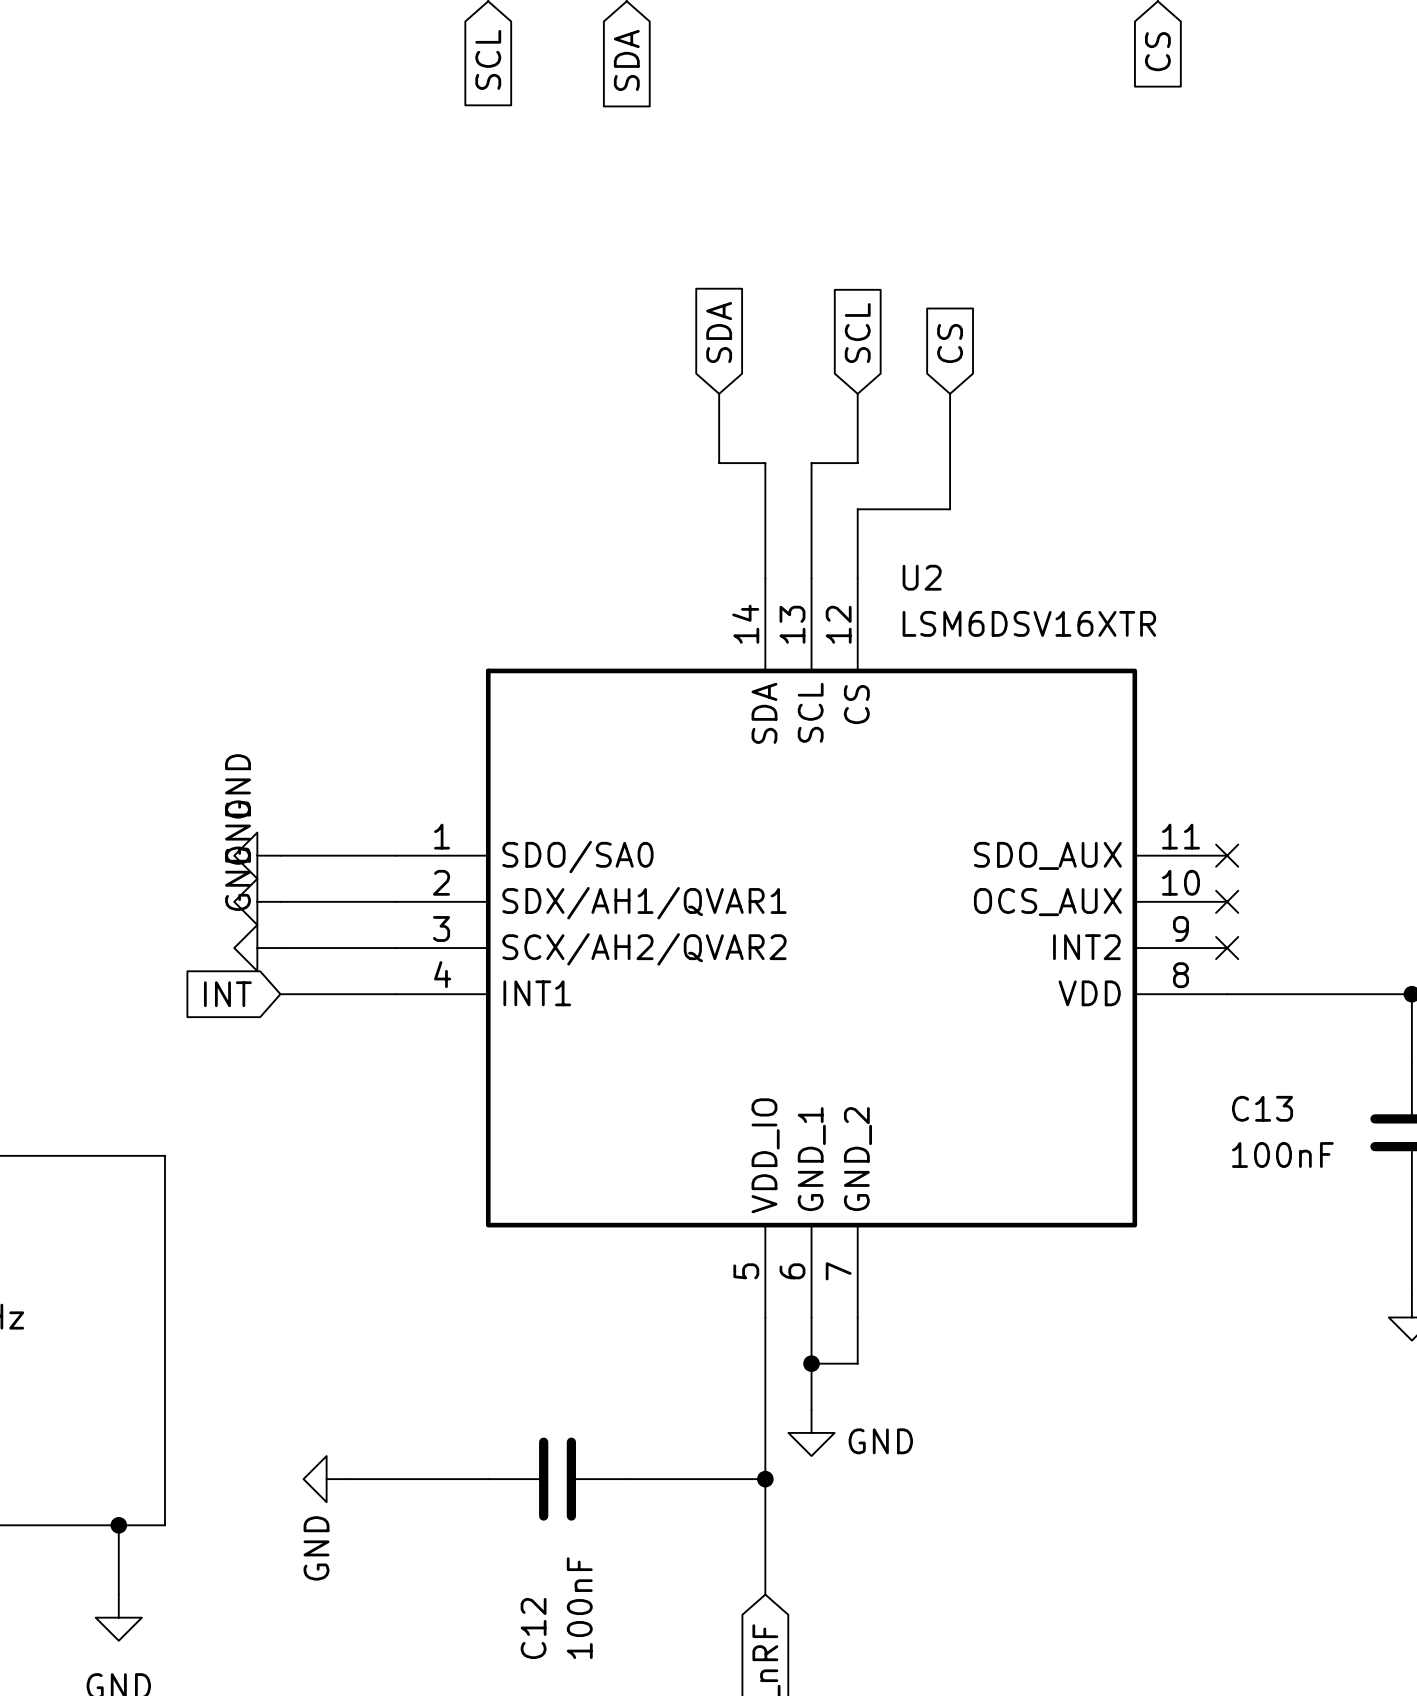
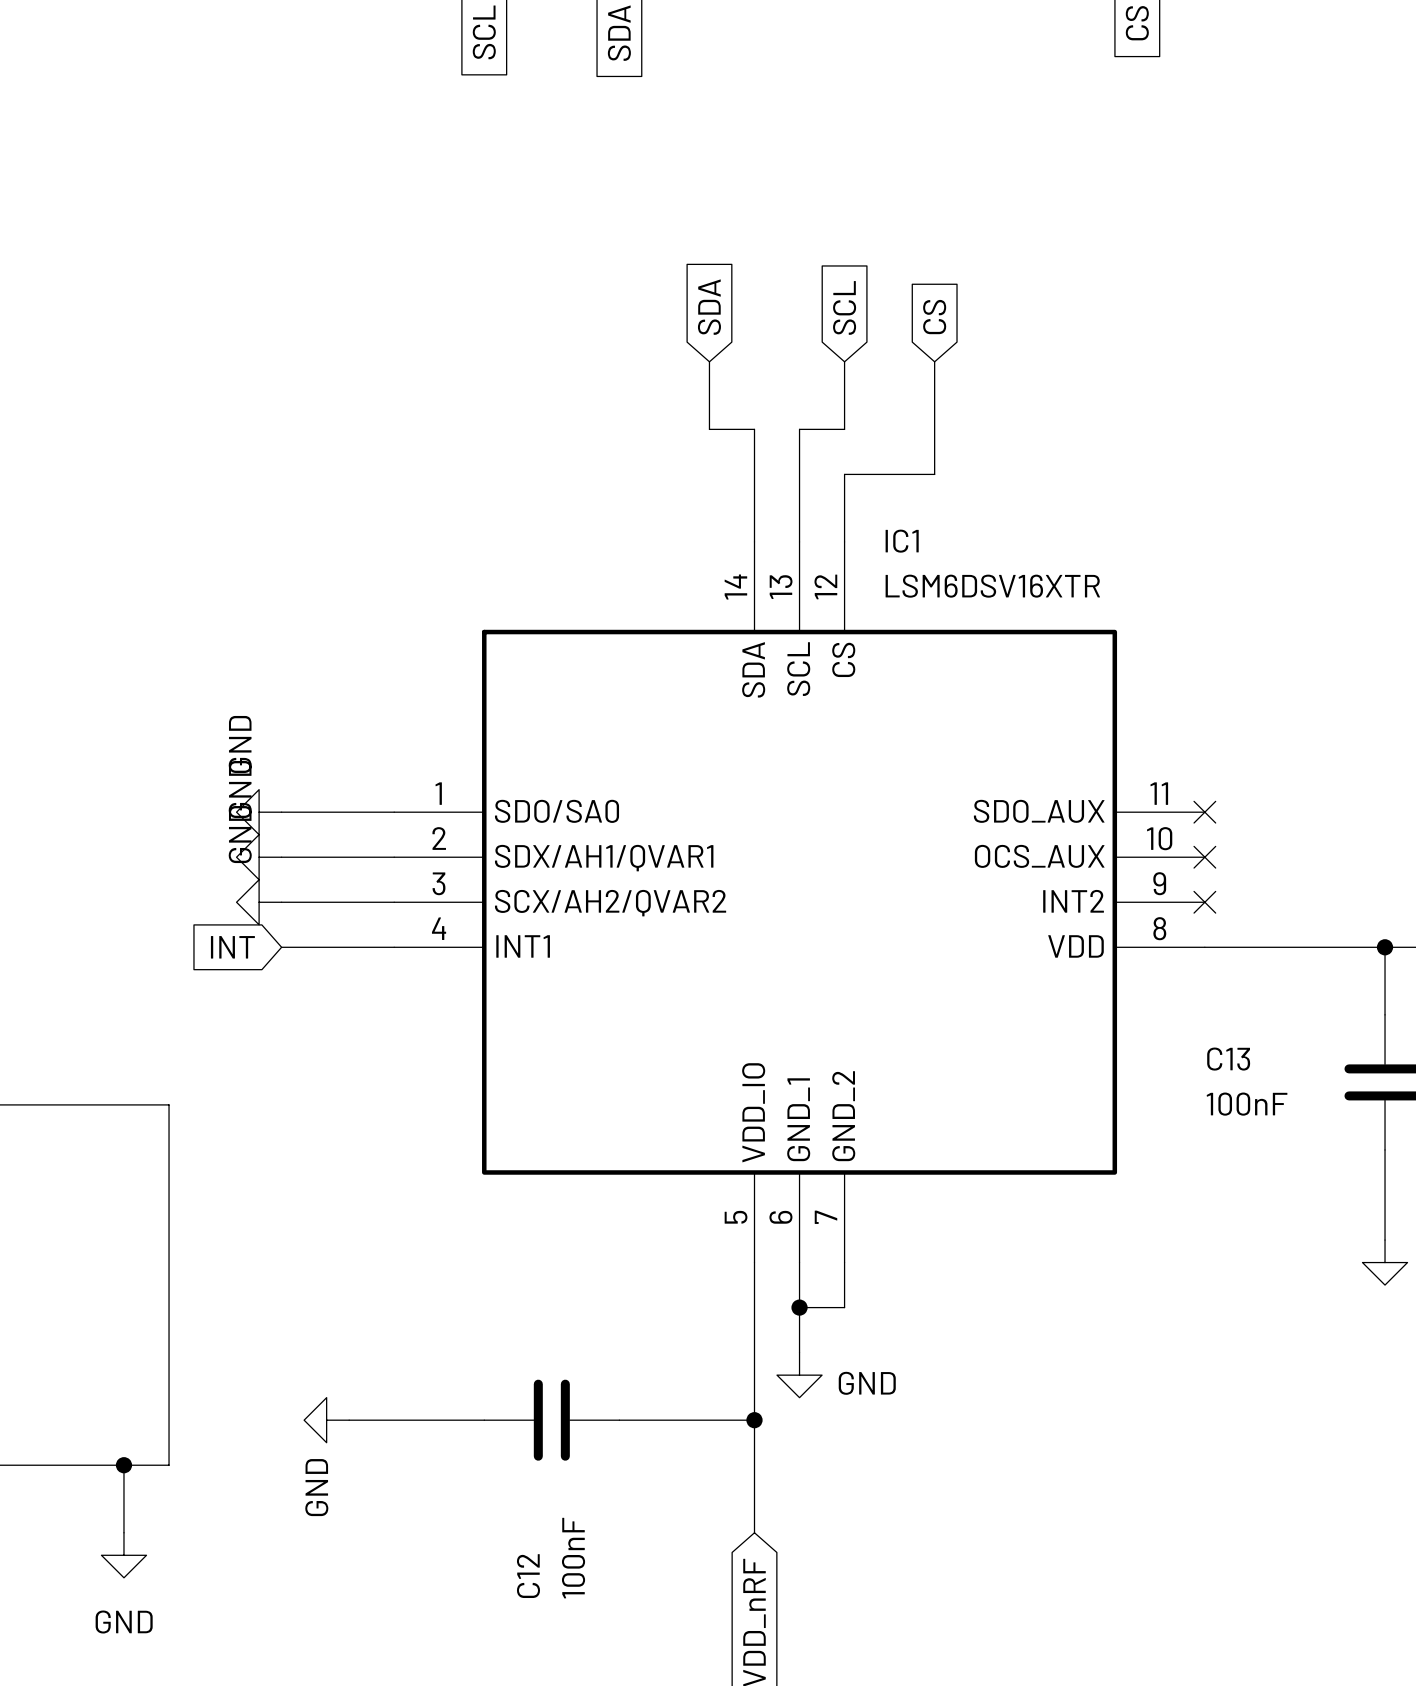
U2 name: U2 (922, 577) -> IC1 (902, 541)

